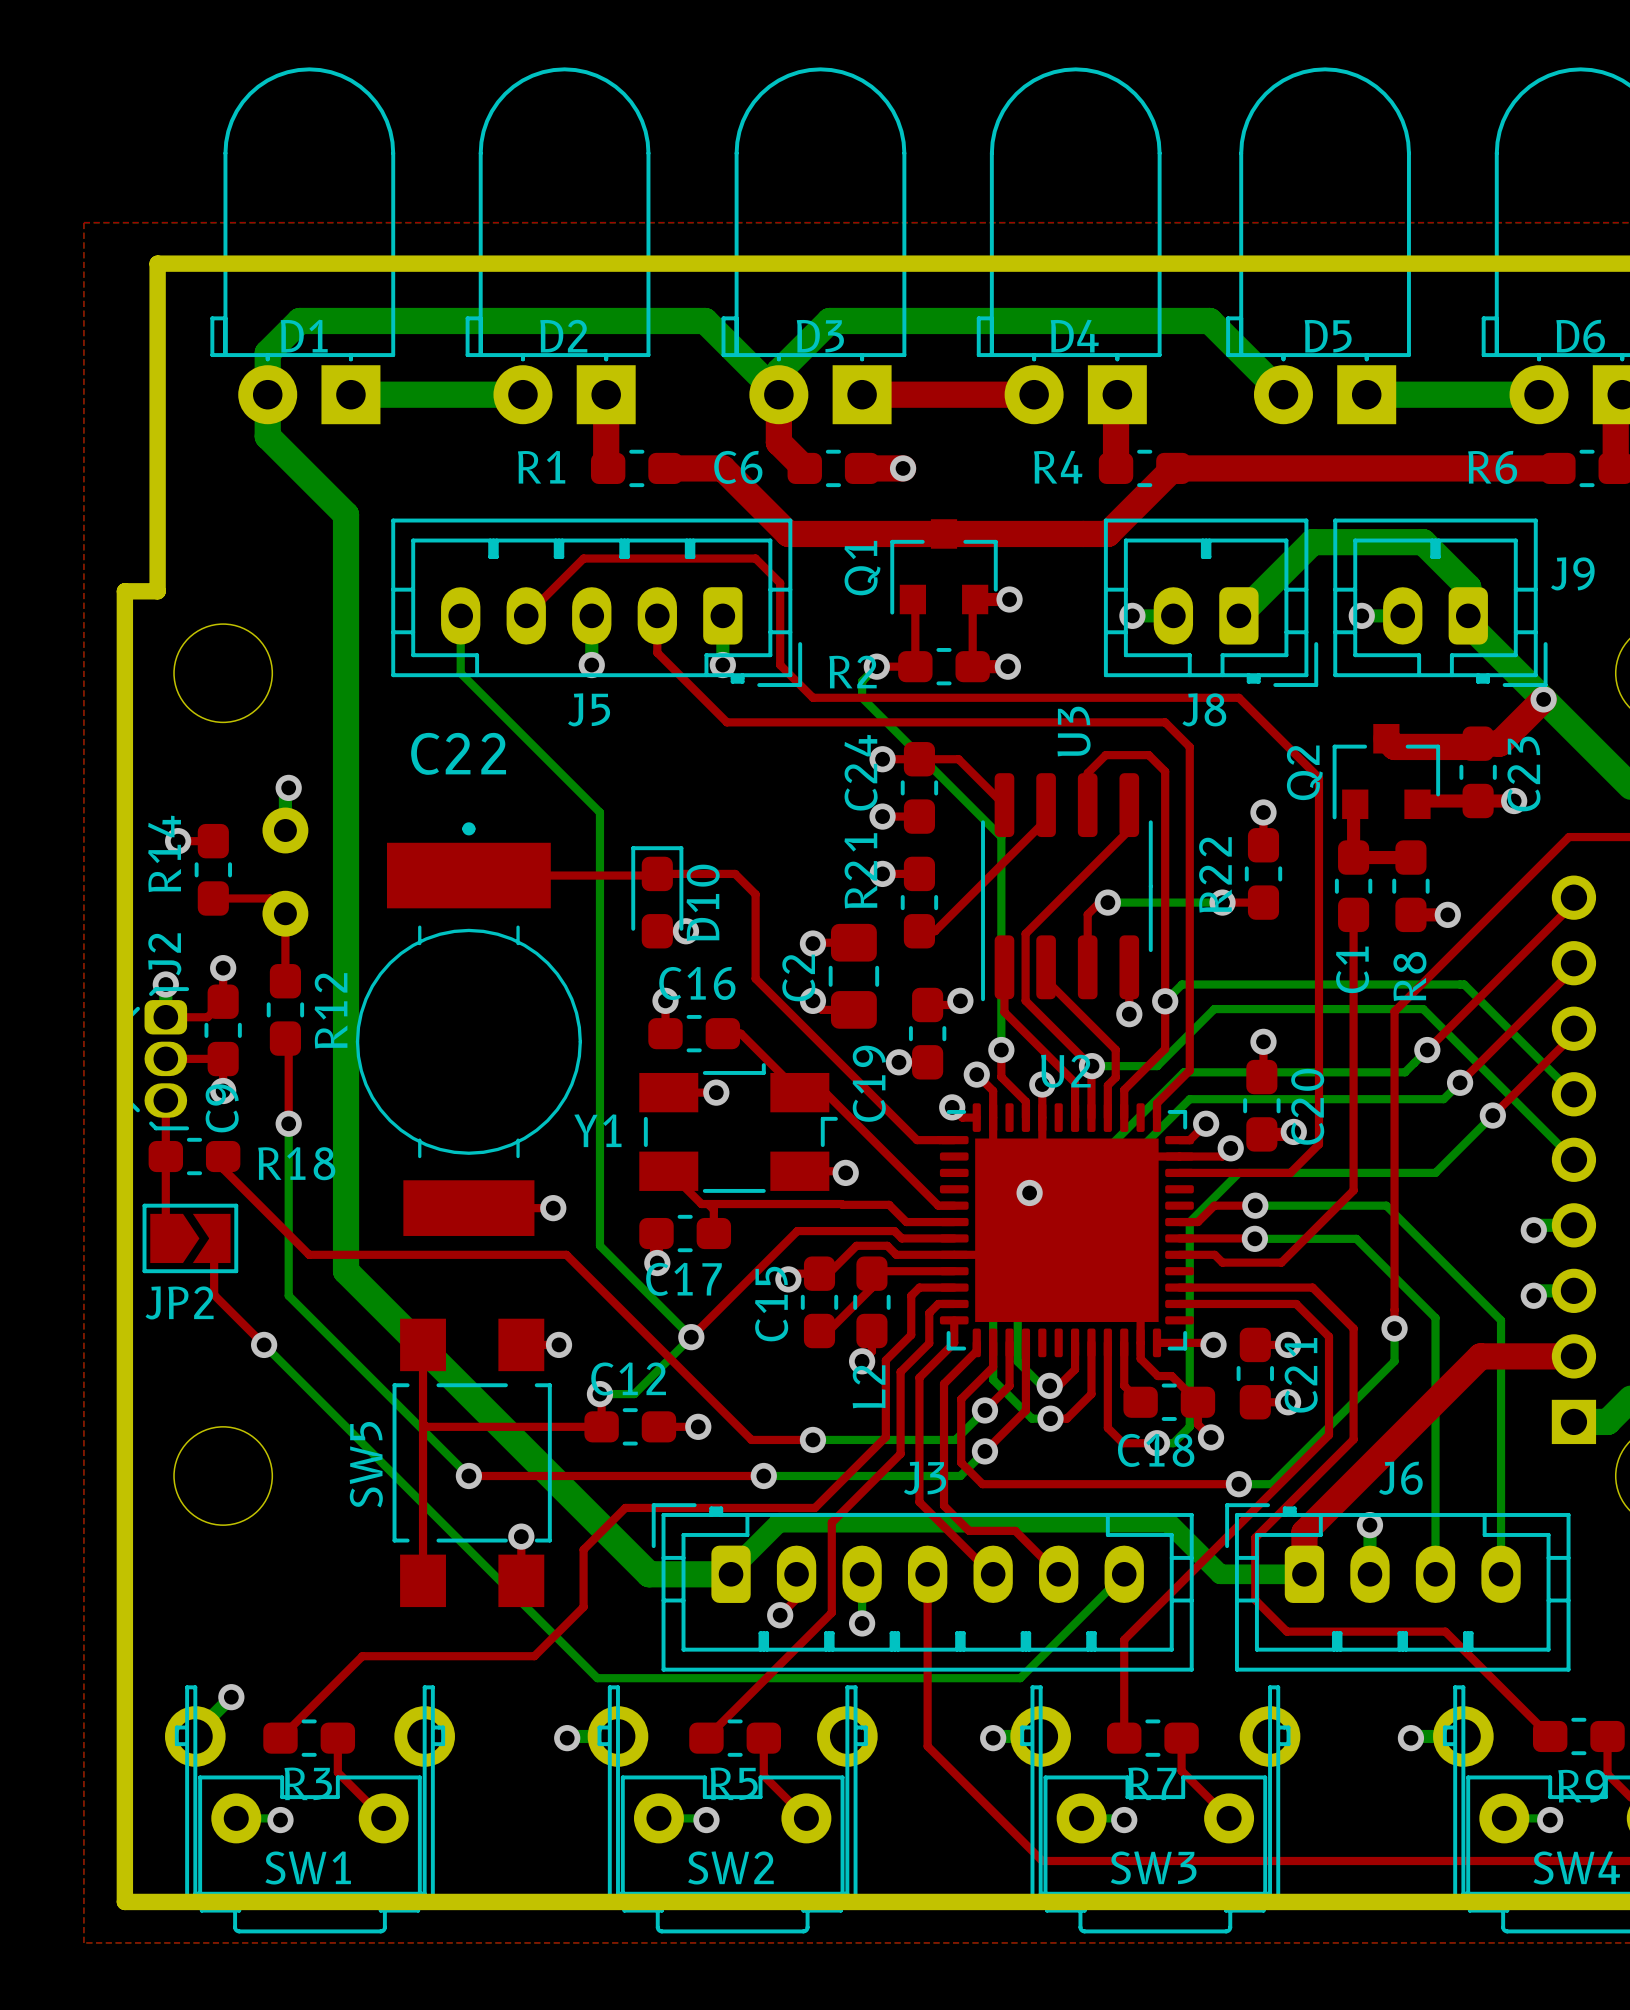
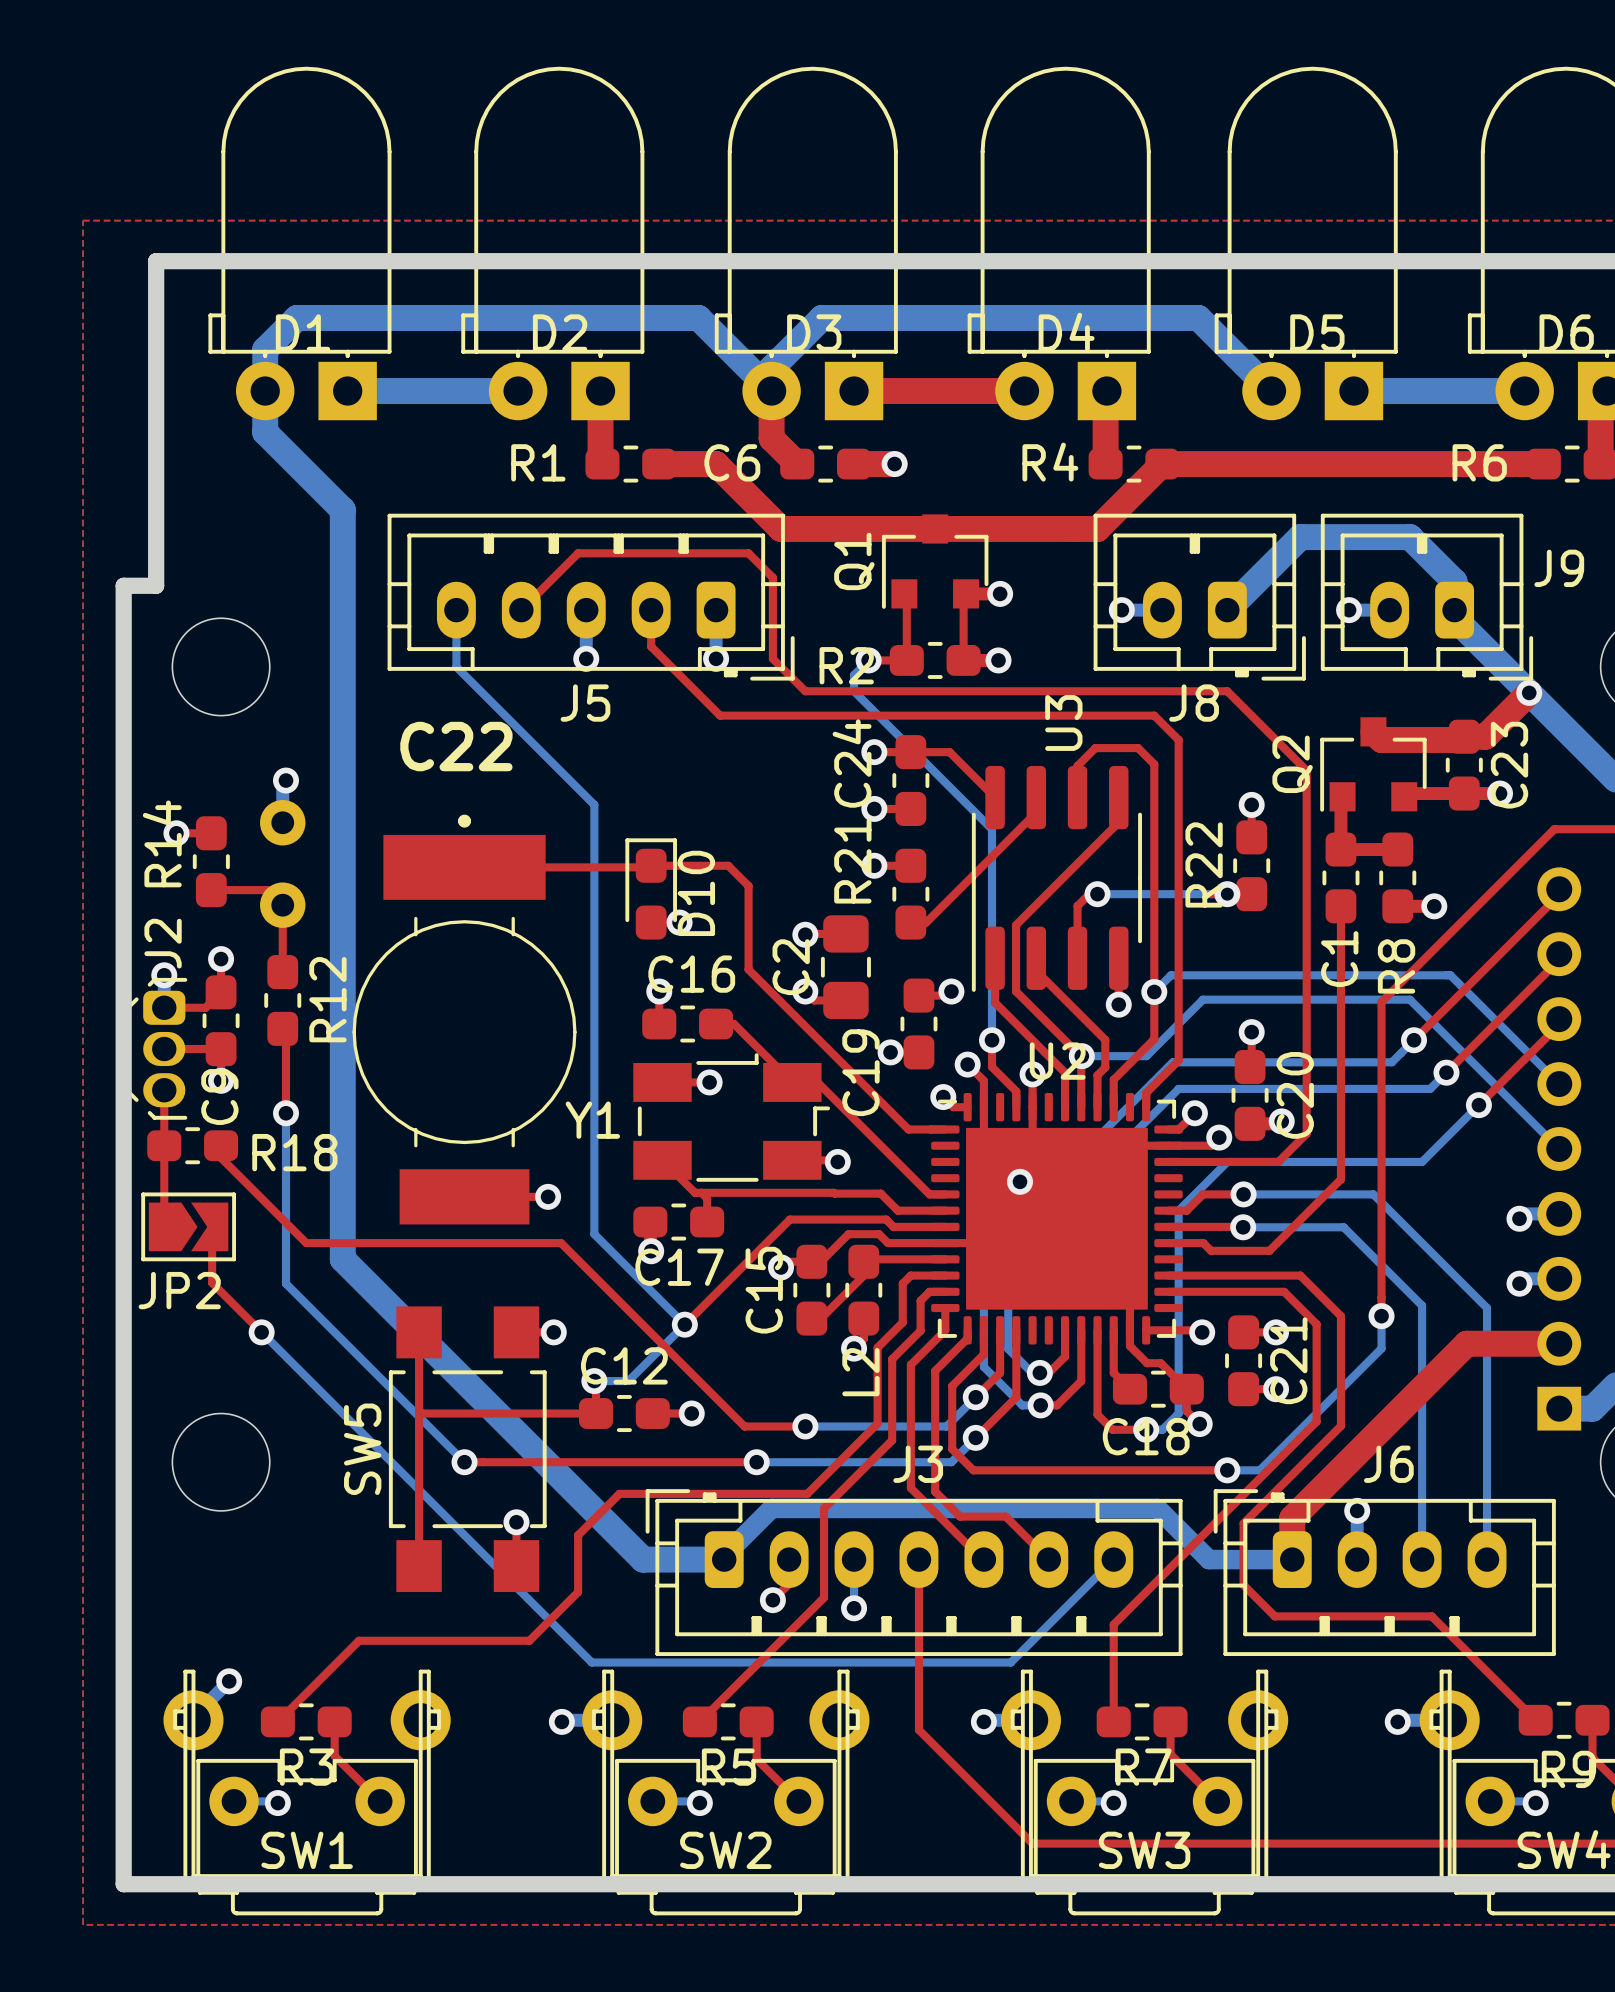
via position: (1222, 902) -> (1227, 894)

